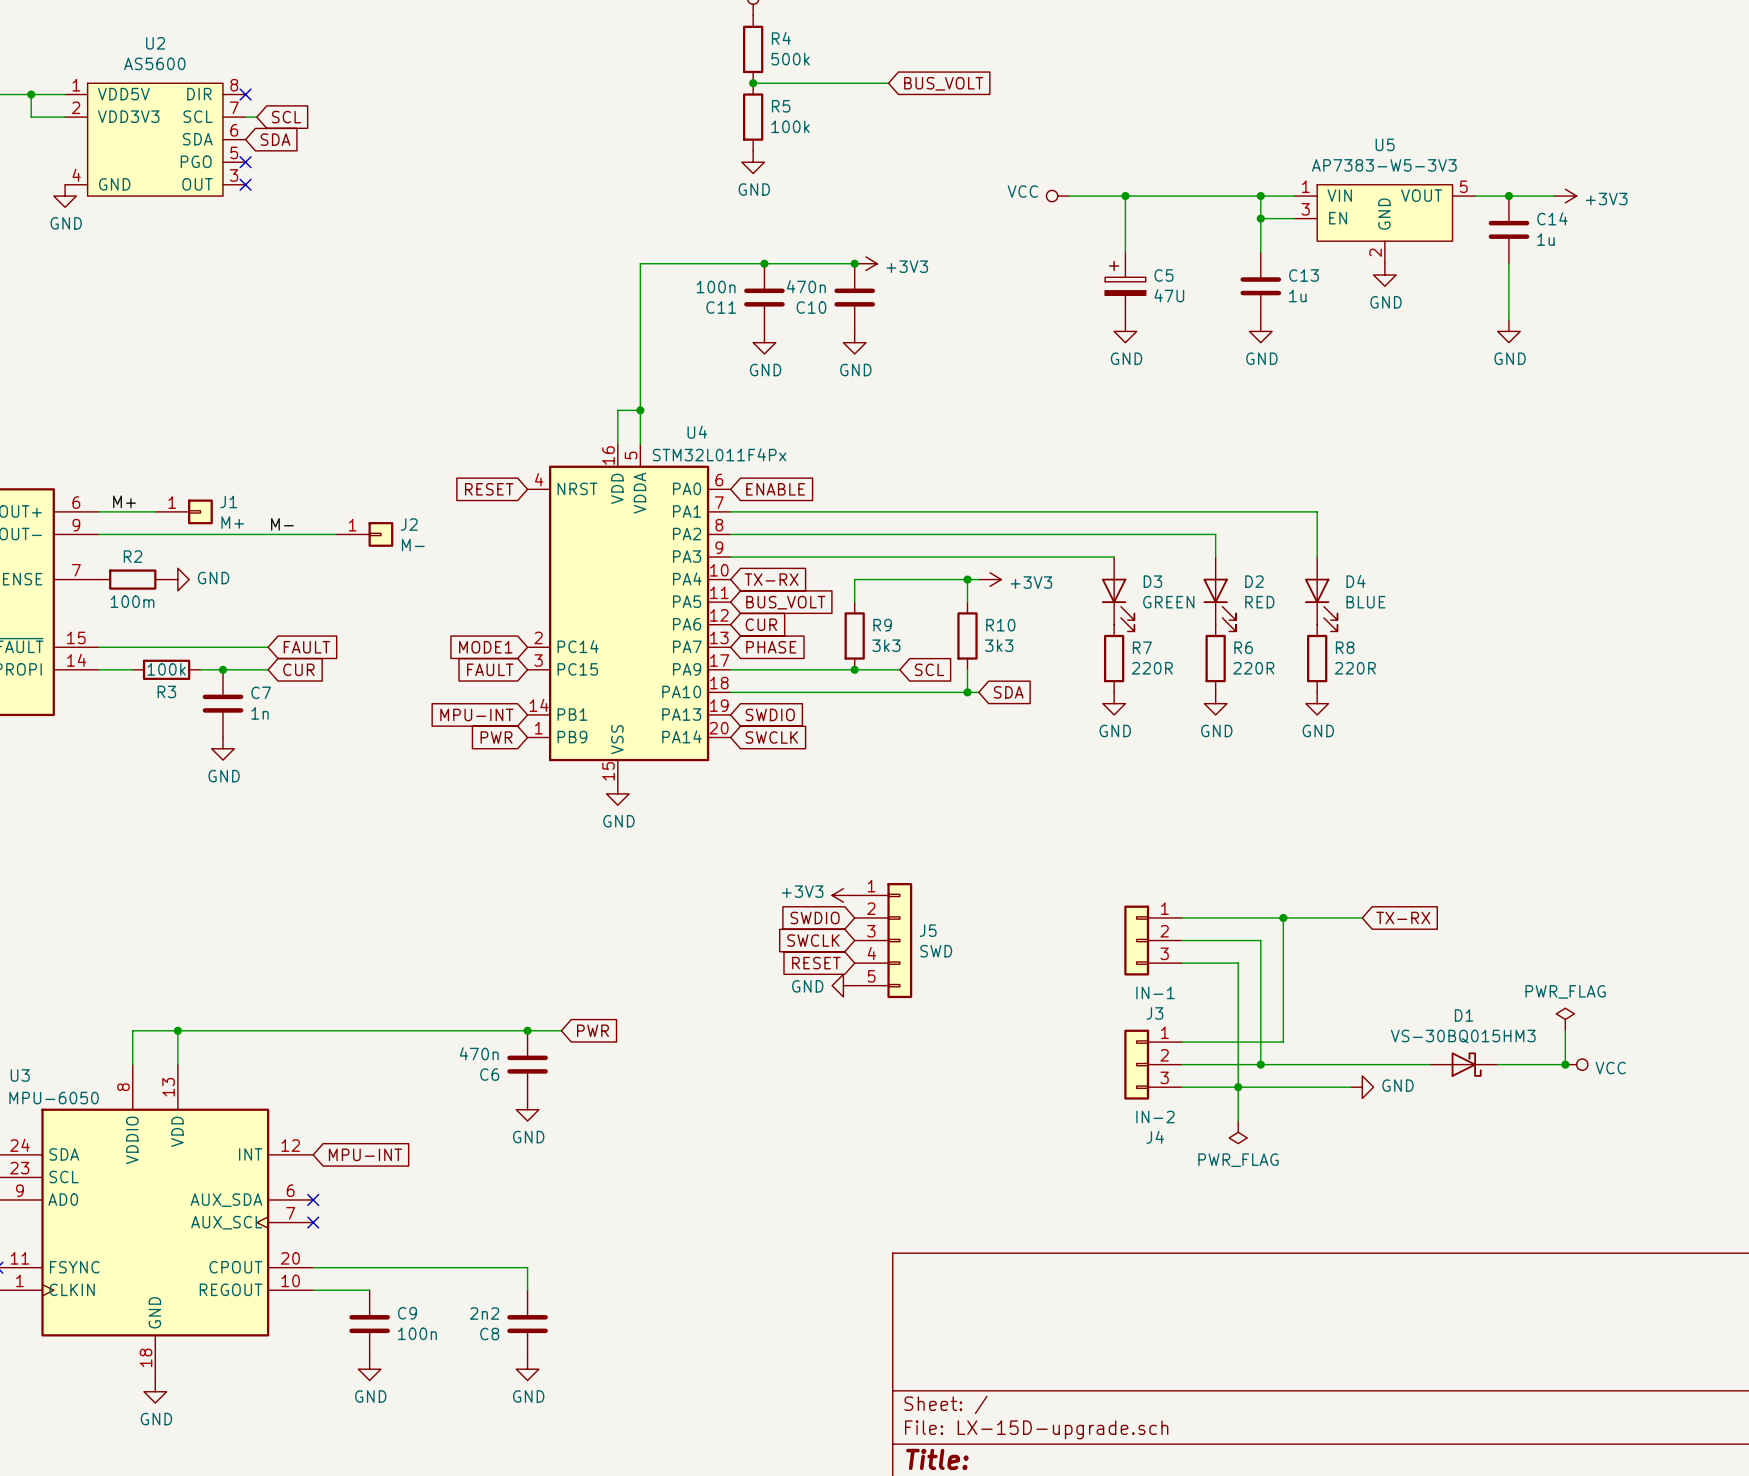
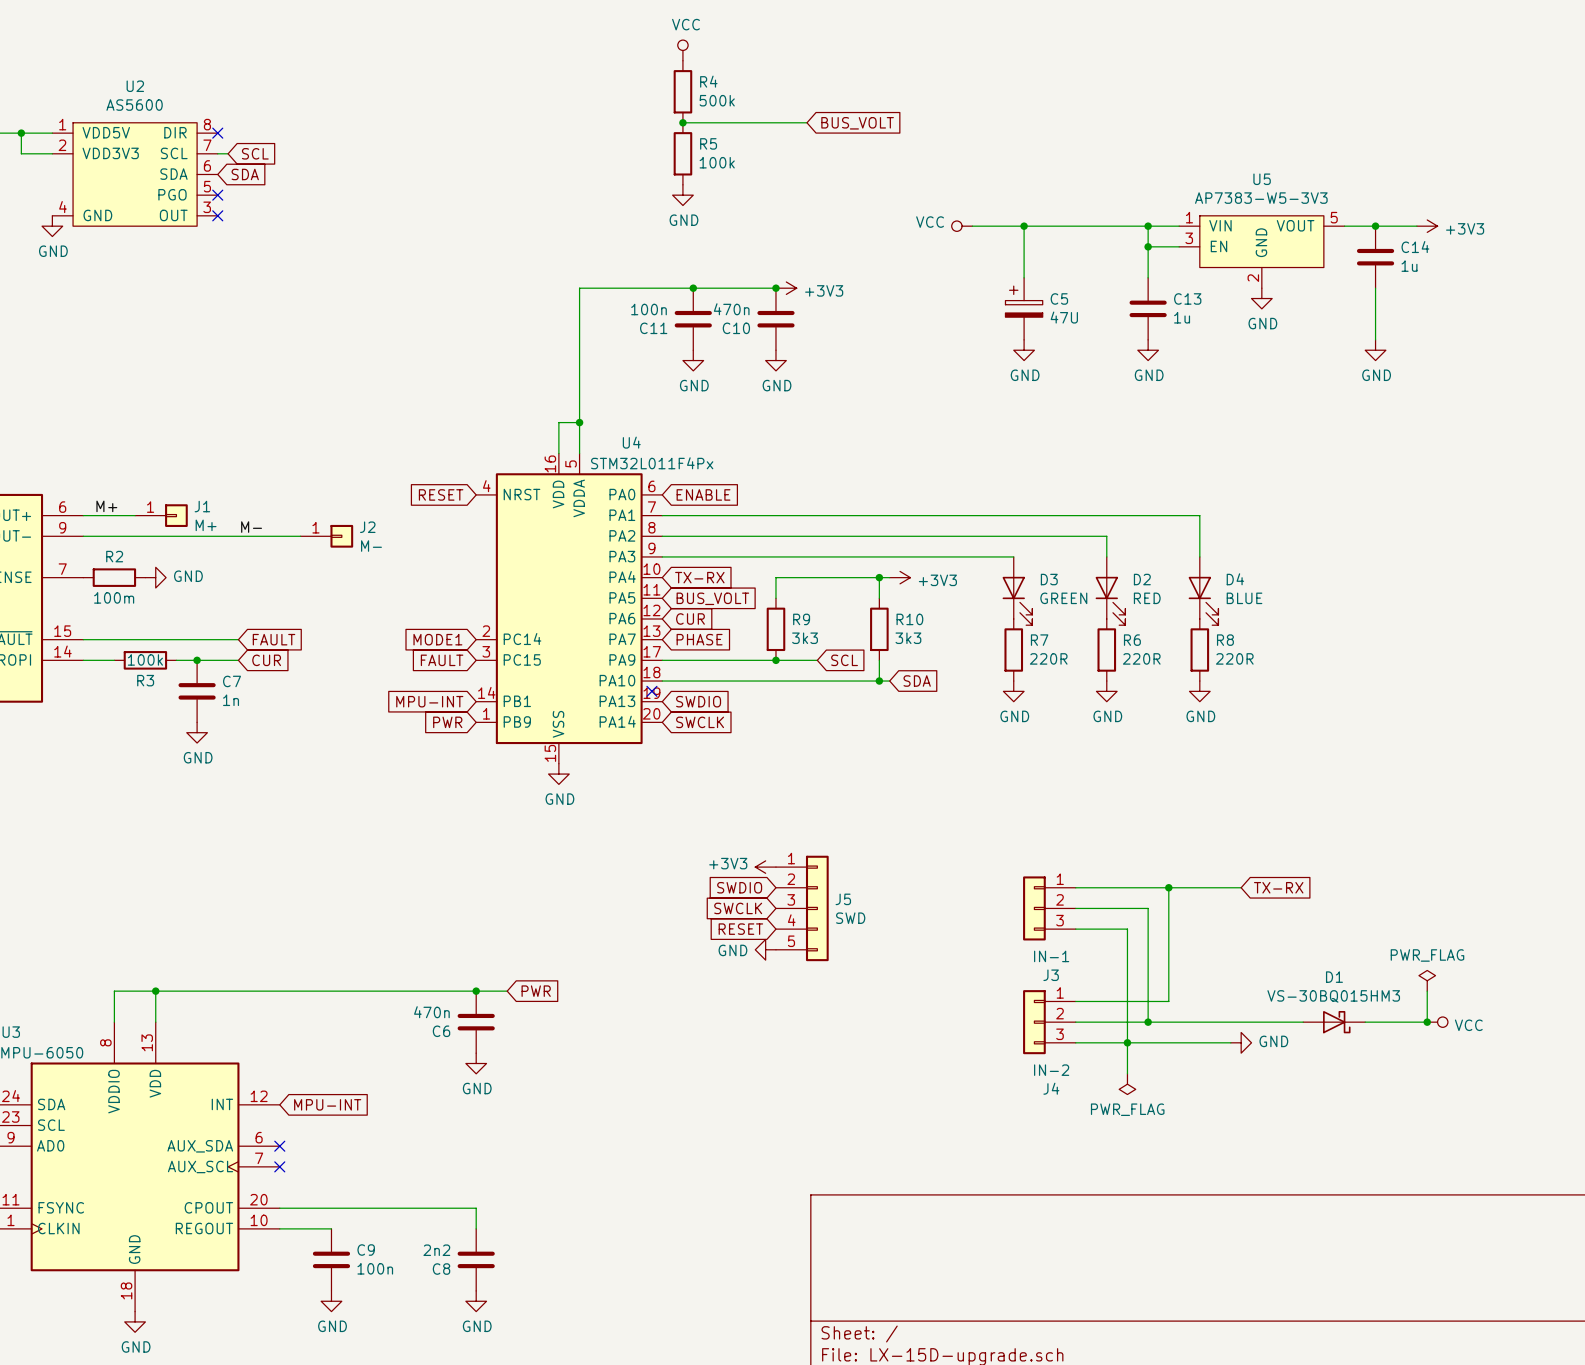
no-connect mark: none -> (651, 691)

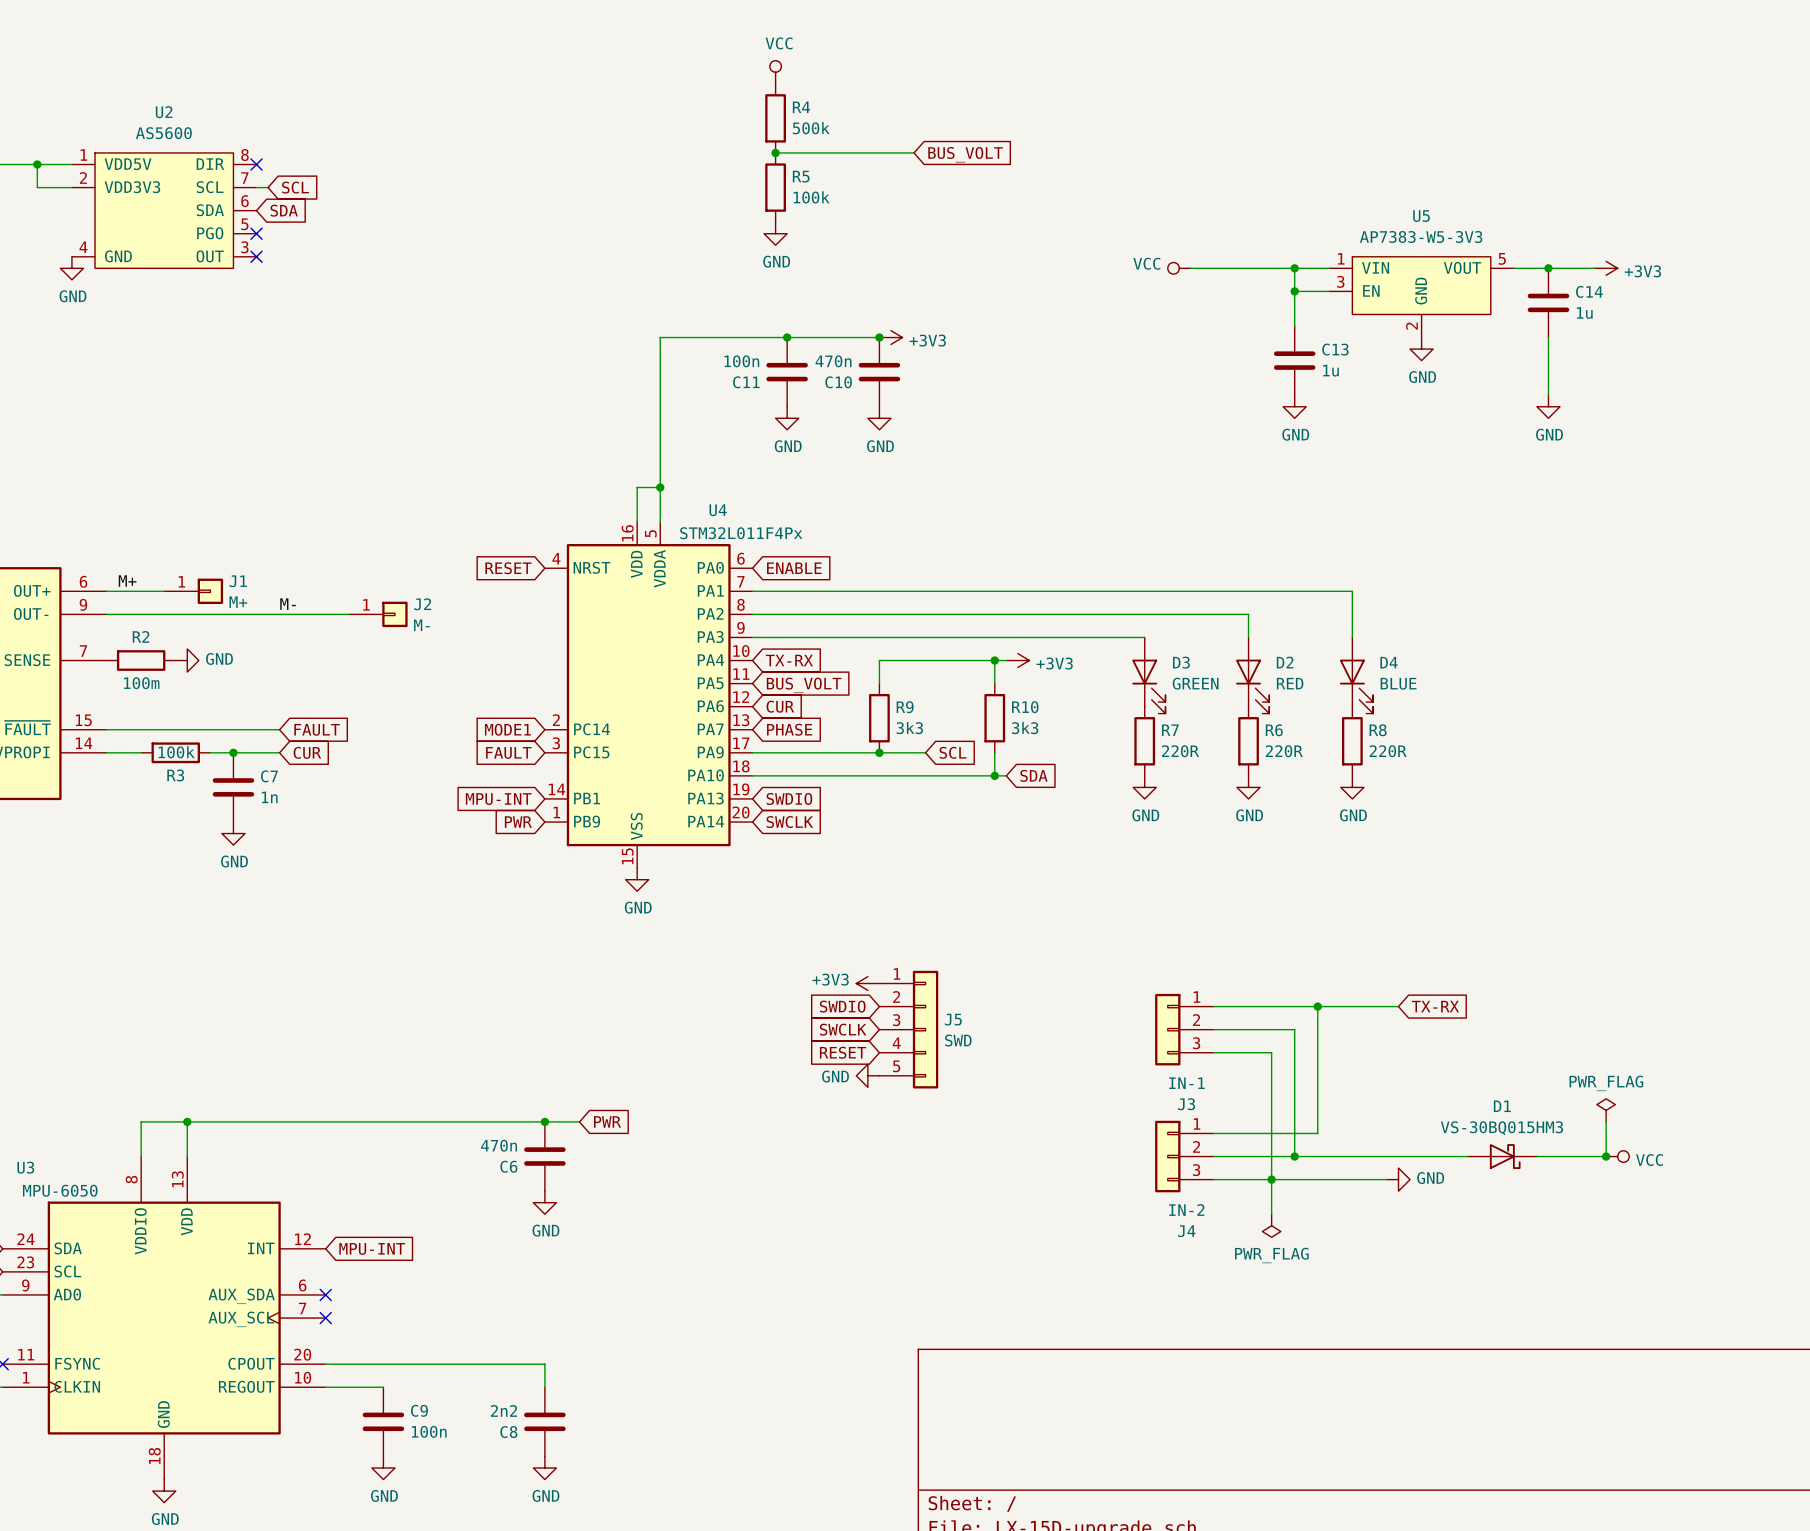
power symbol position: VCC (962, 226) -> VCC (1179, 268)
wire: (972, 226) (1055, 226) -> none
wire: (1024, 226) (1024, 277) -> none
junction: (1024, 226) -> none
C5: 47U (1024, 308) -> none
power symbol: GND (1024, 350) -> none
no-connect mark: (651, 691) -> none

